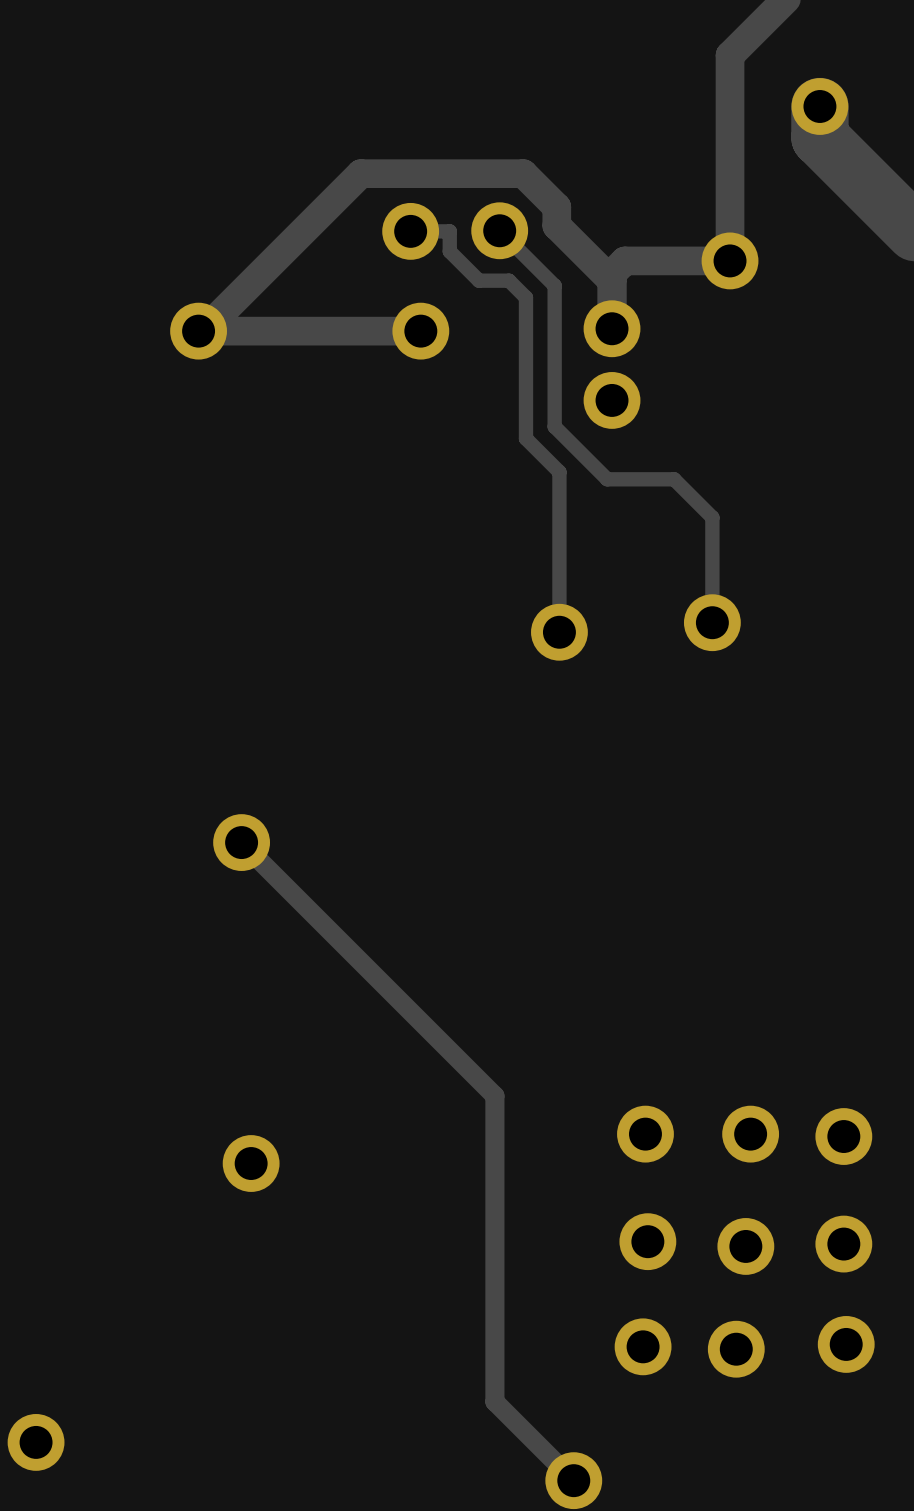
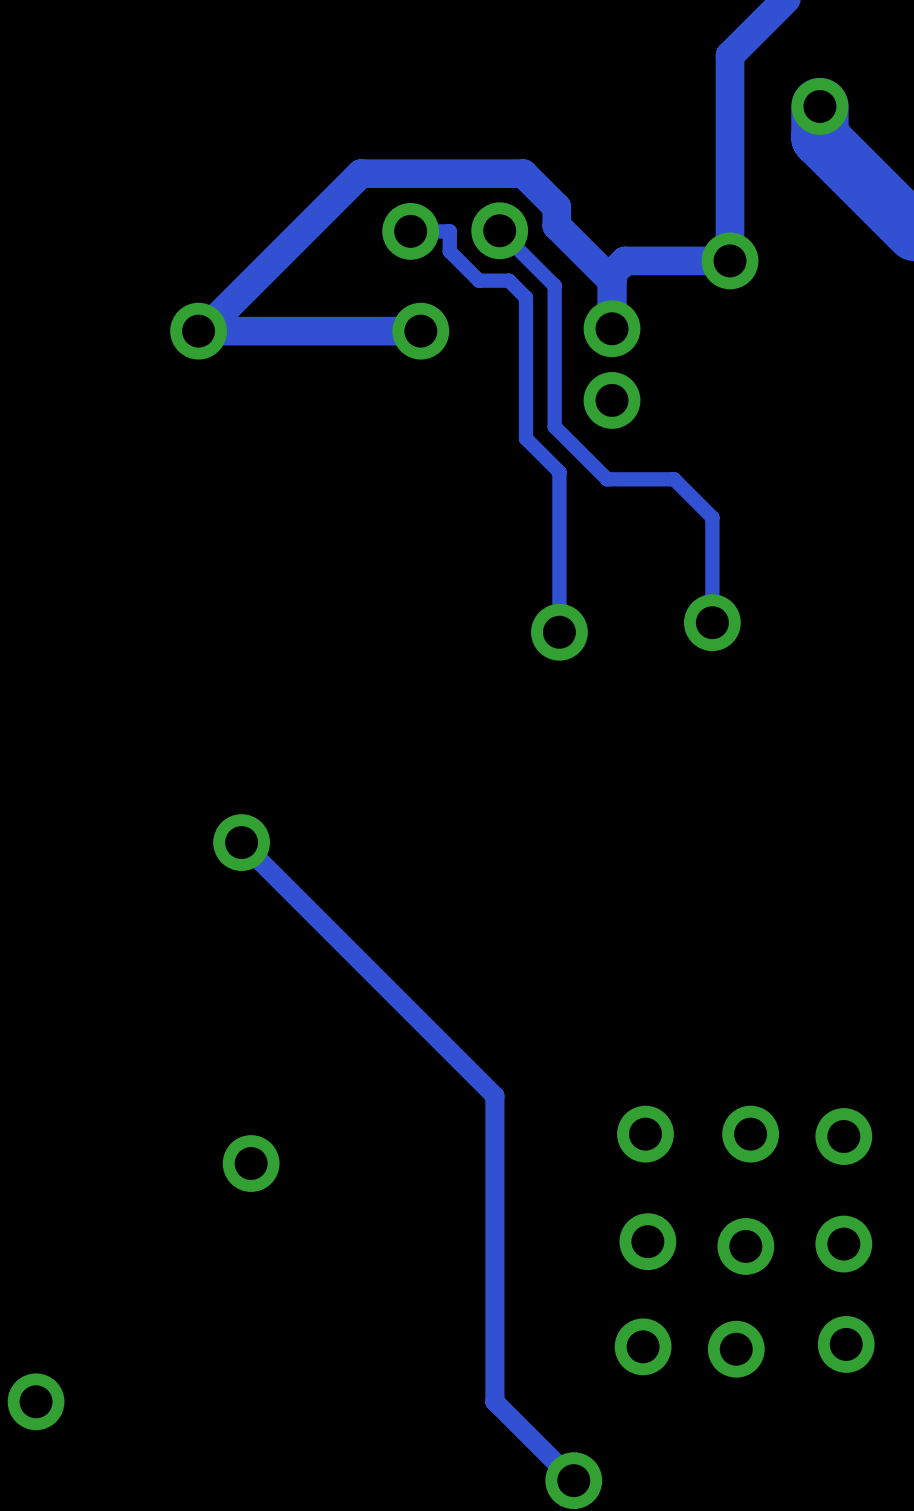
via position: (36, 1442) -> (36, 1401)

